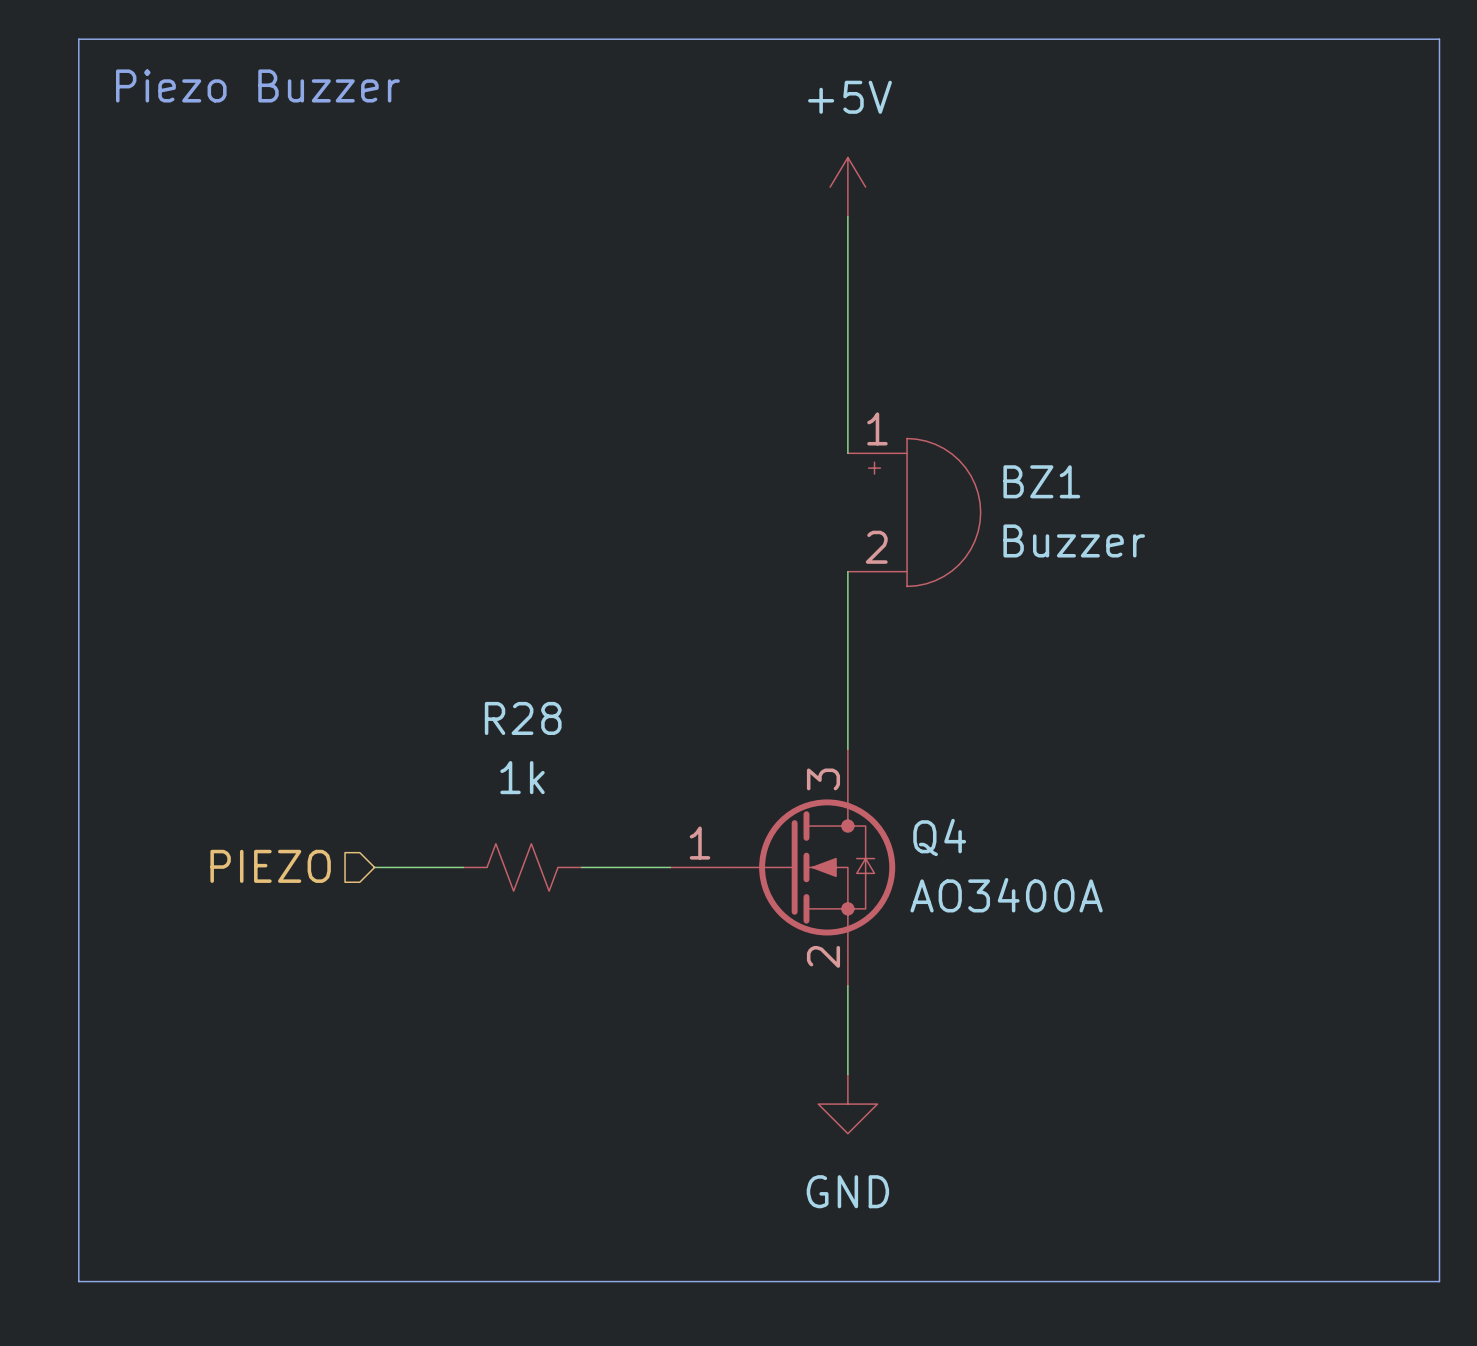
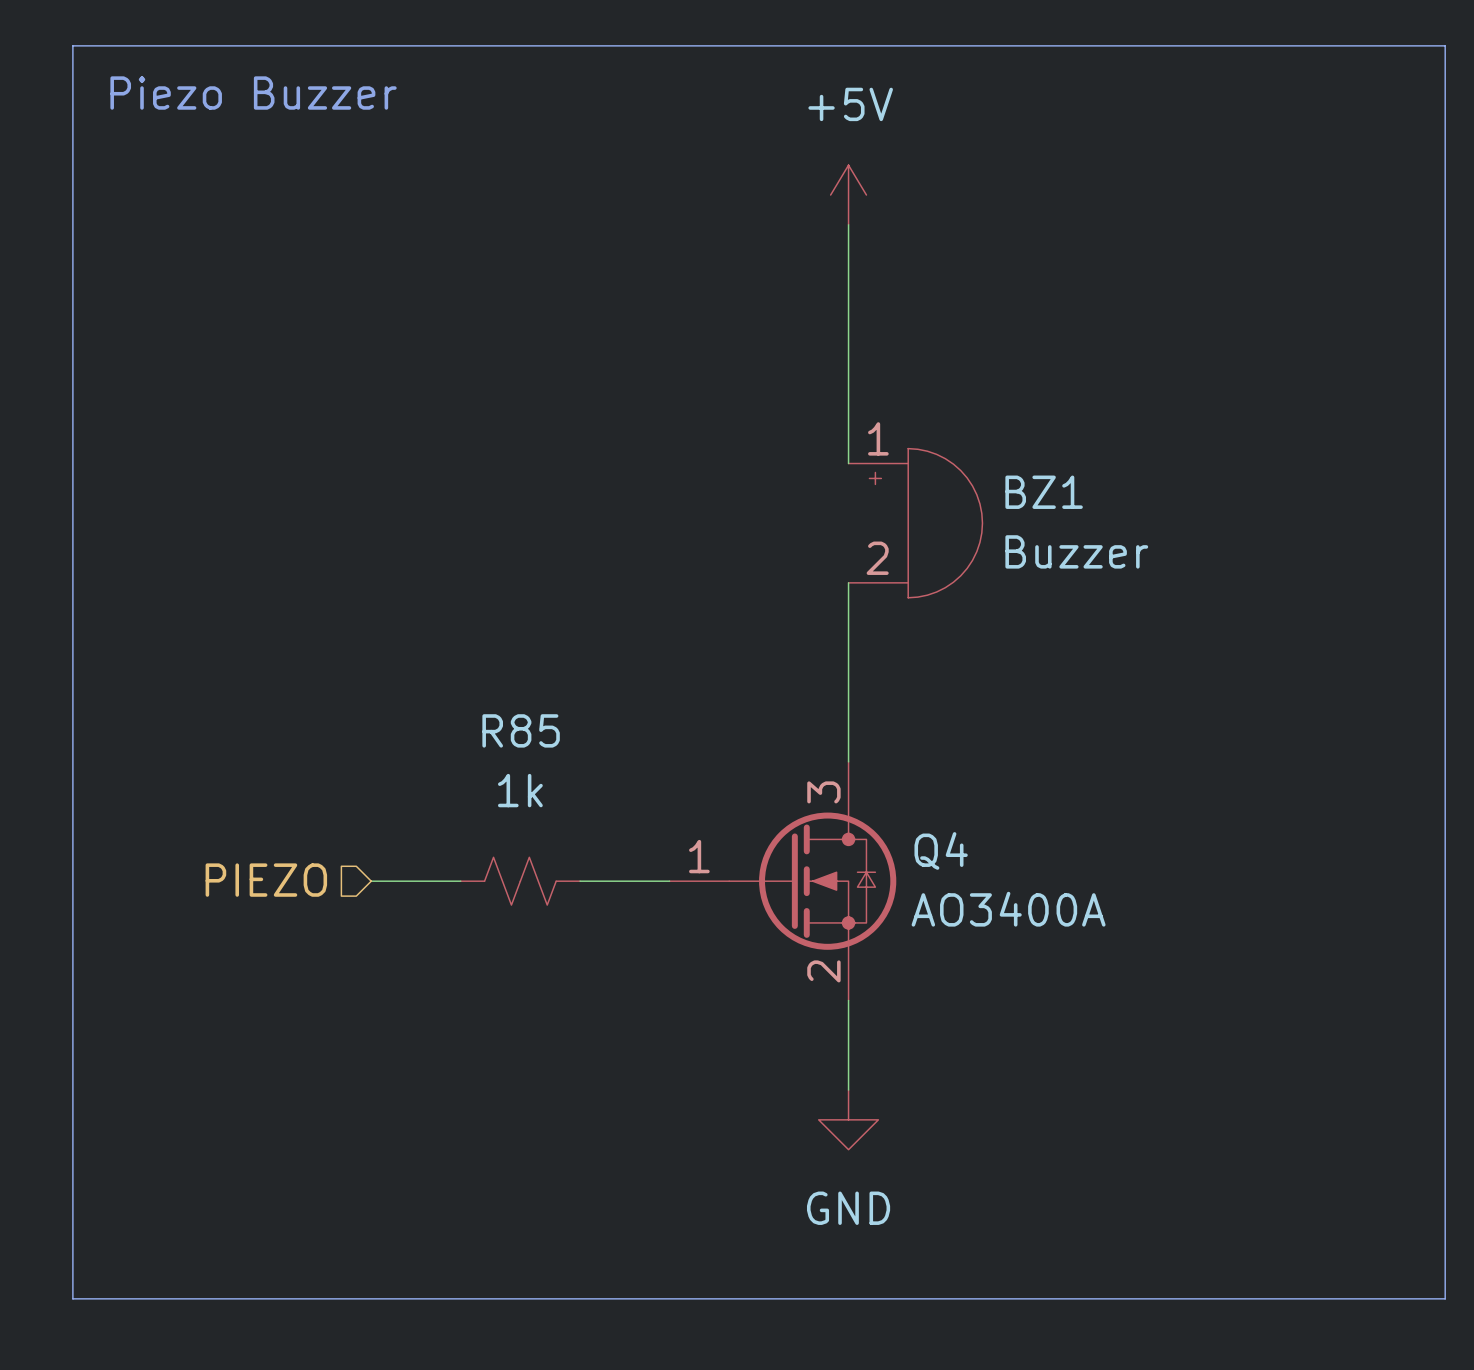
R28 name: R28 (523, 718) -> R85 (521, 730)

